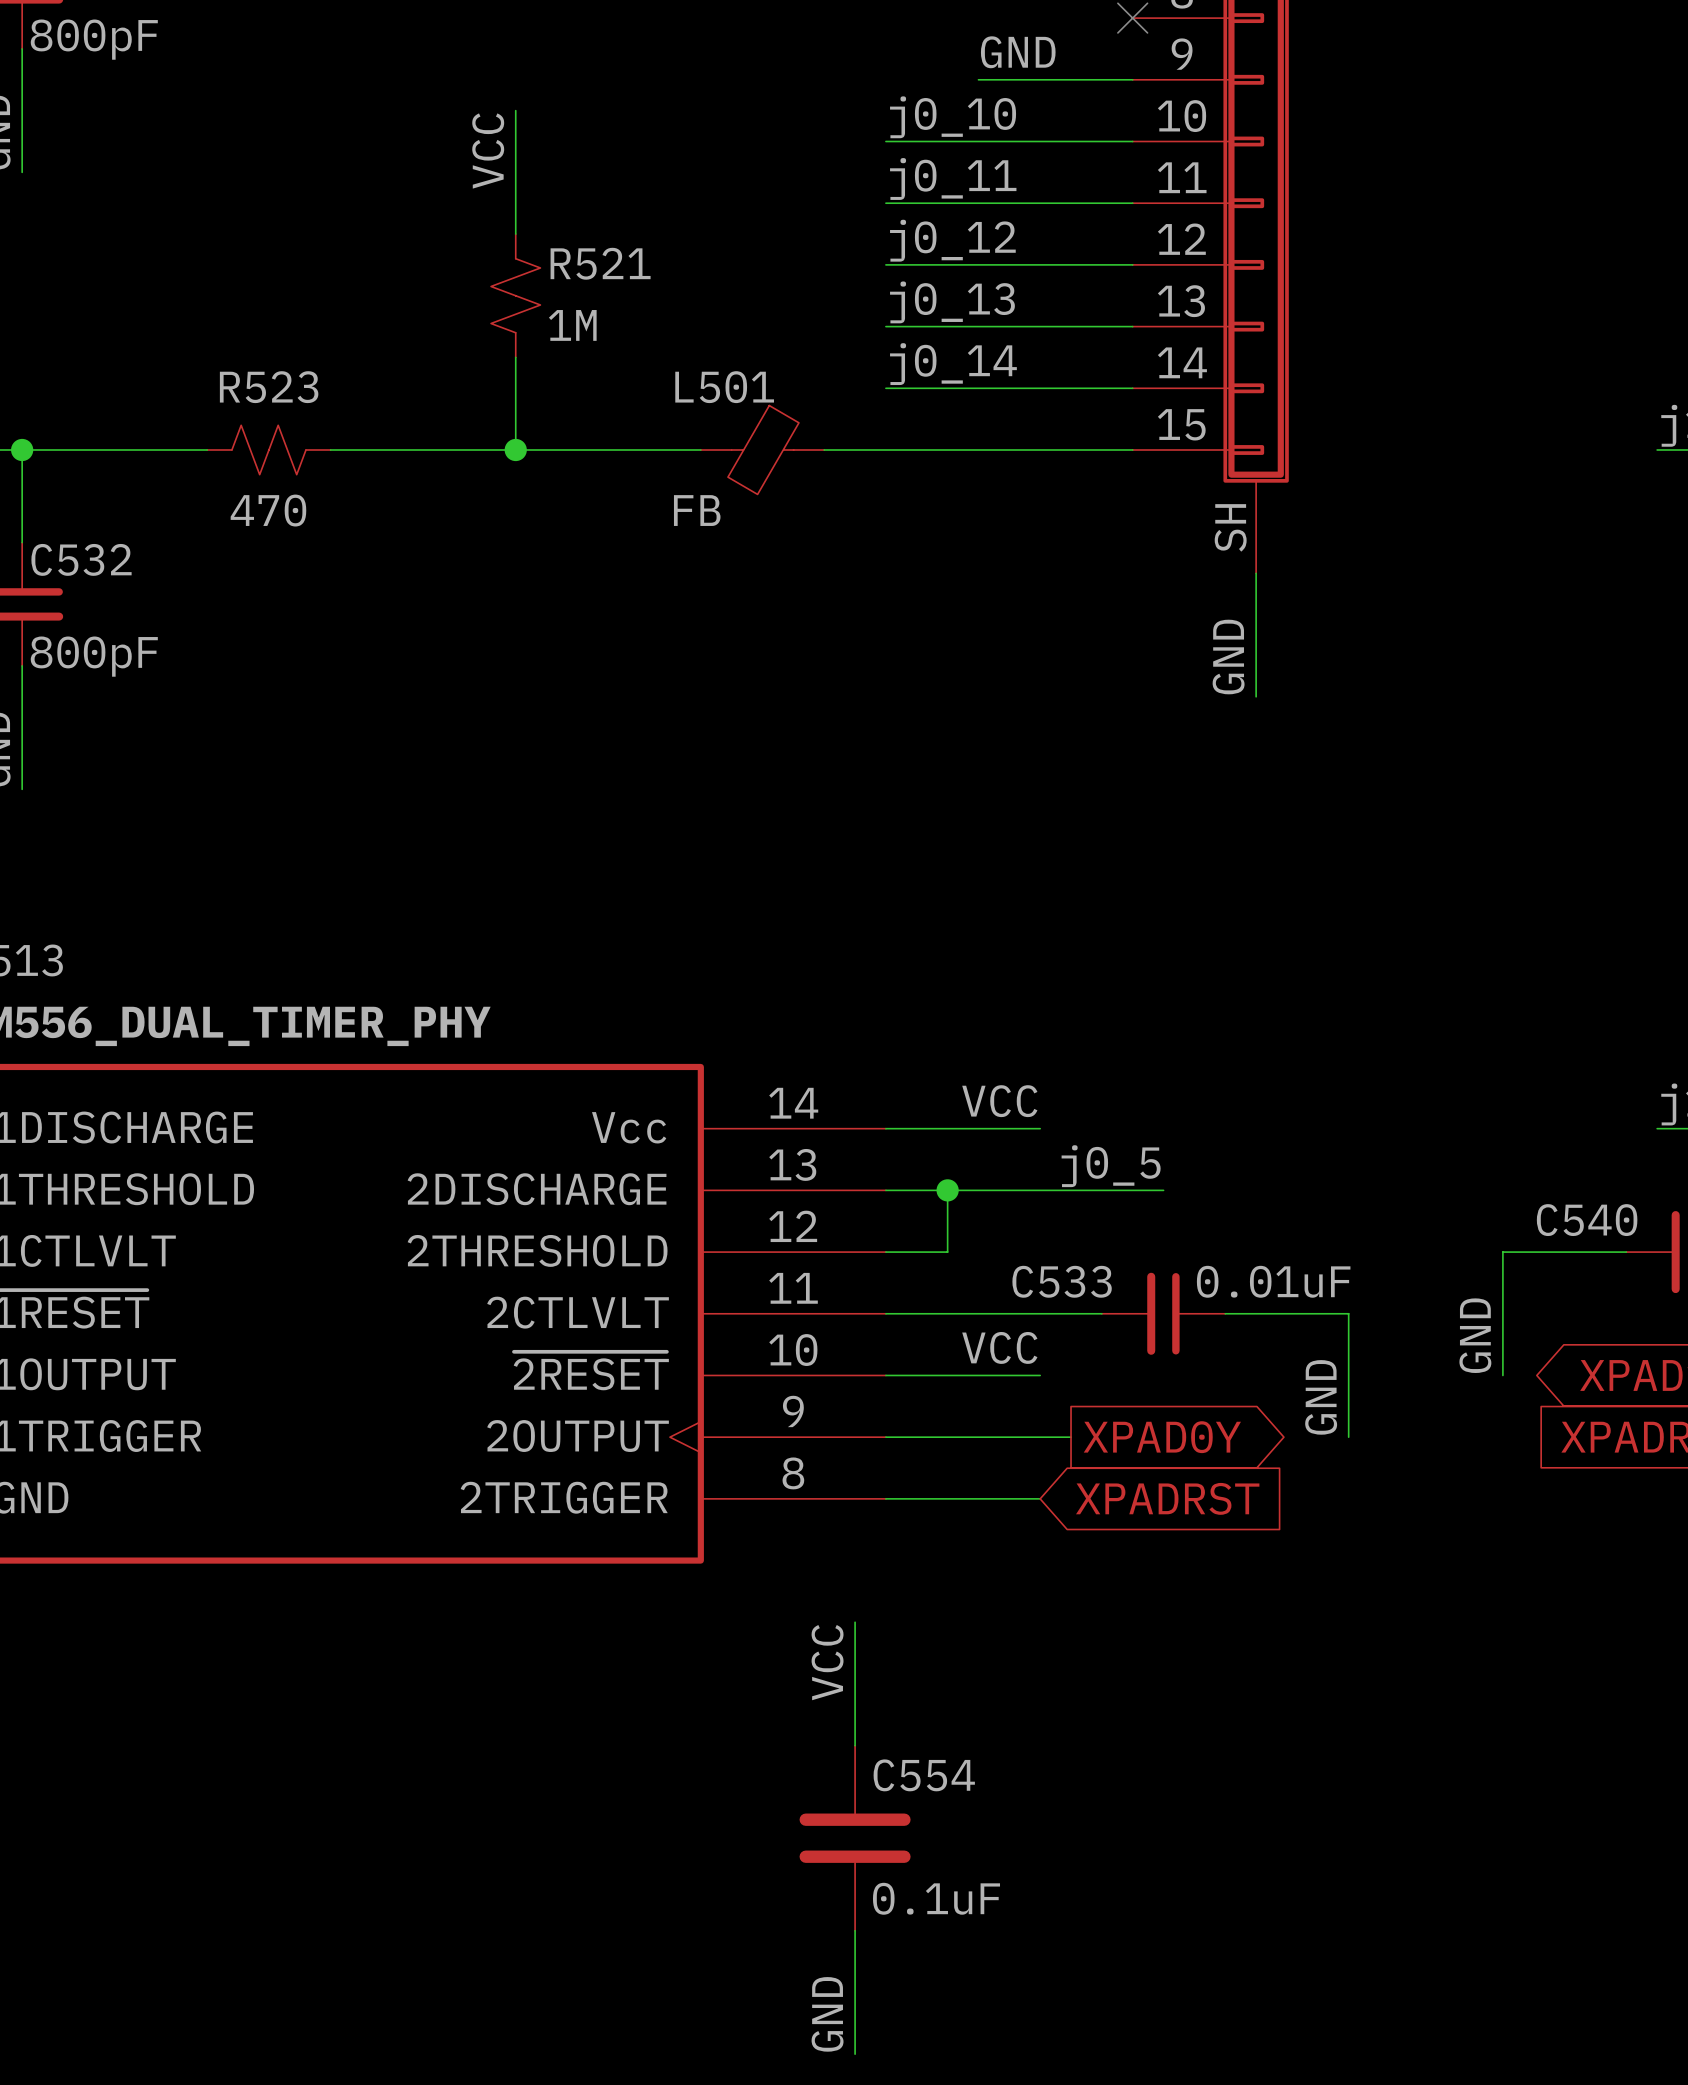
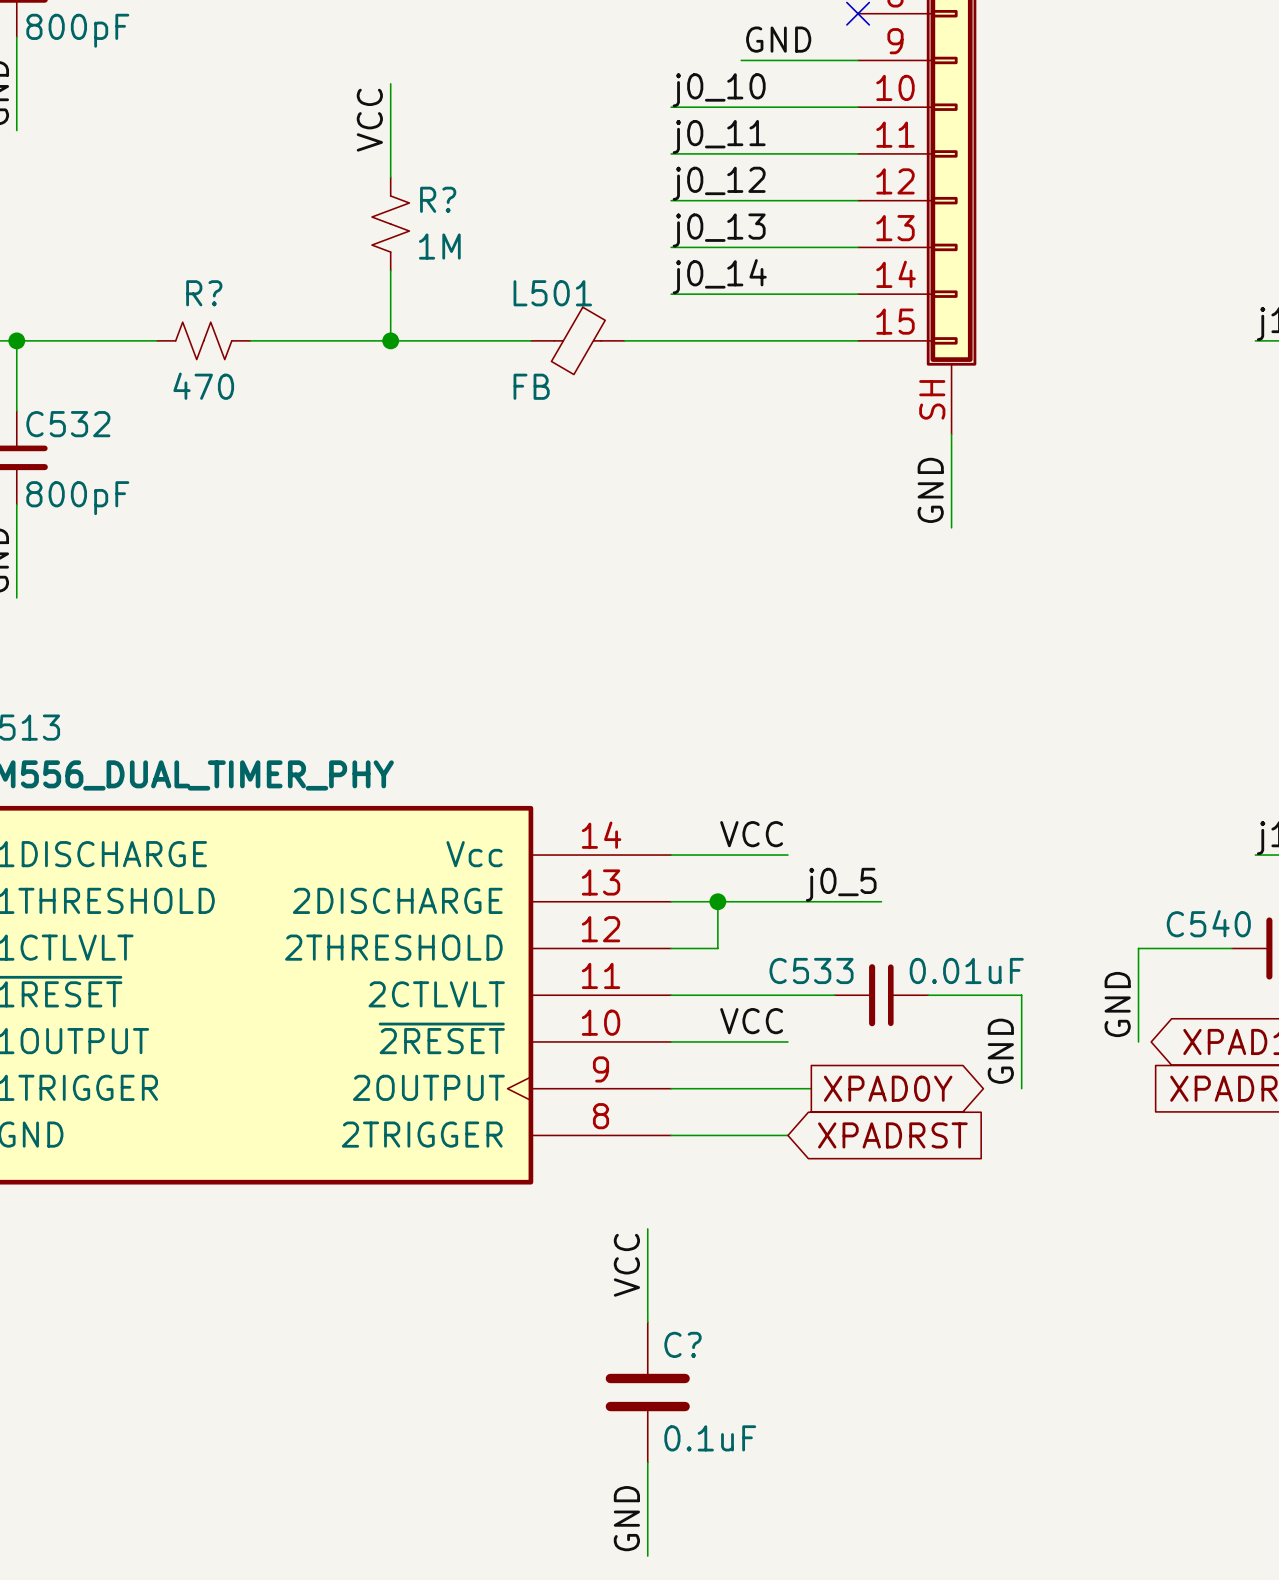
R521 name: R521 (600, 263) -> R? (438, 199)
R523 name: R523 (269, 387) -> R? (204, 293)
C554 name: C554 (924, 1775) -> C? (682, 1344)

